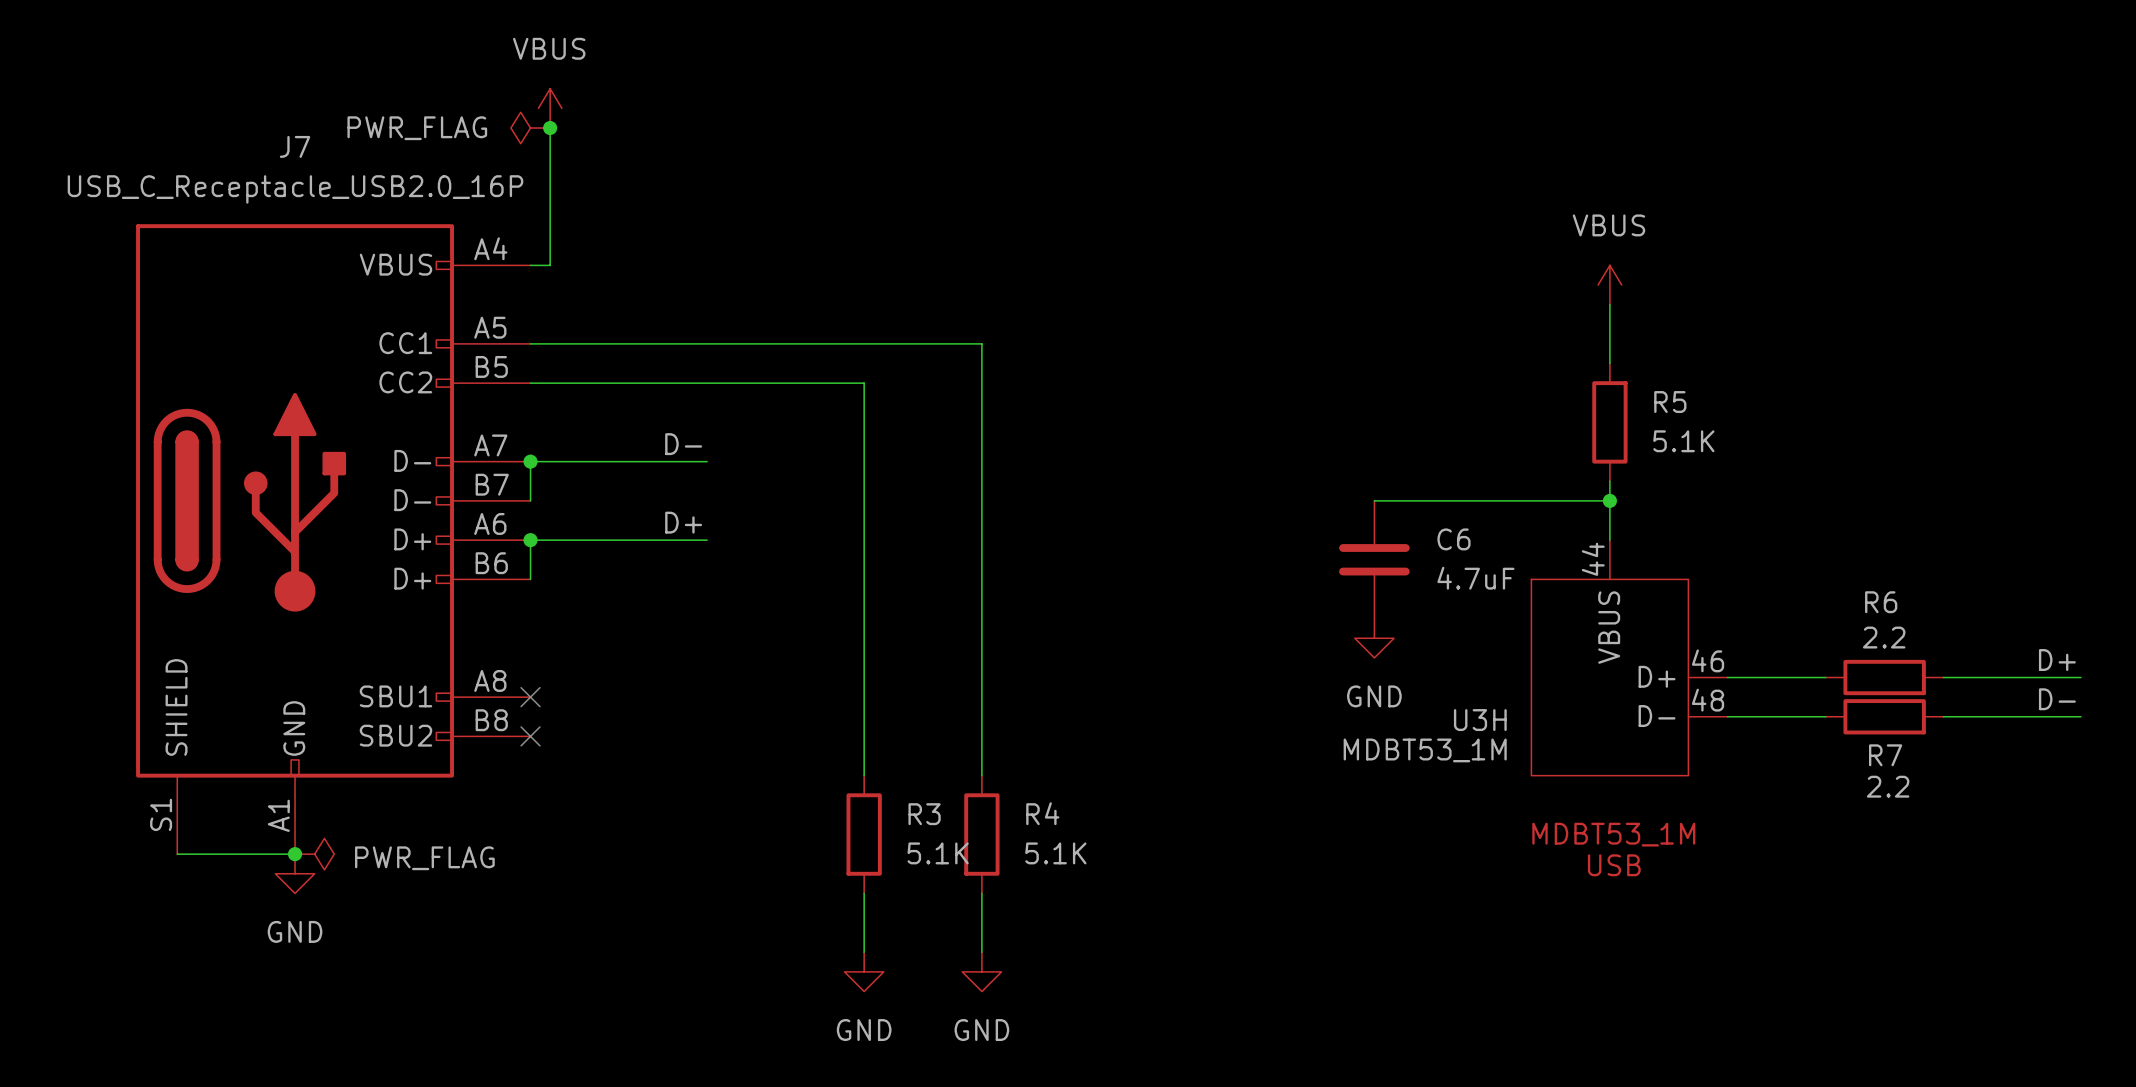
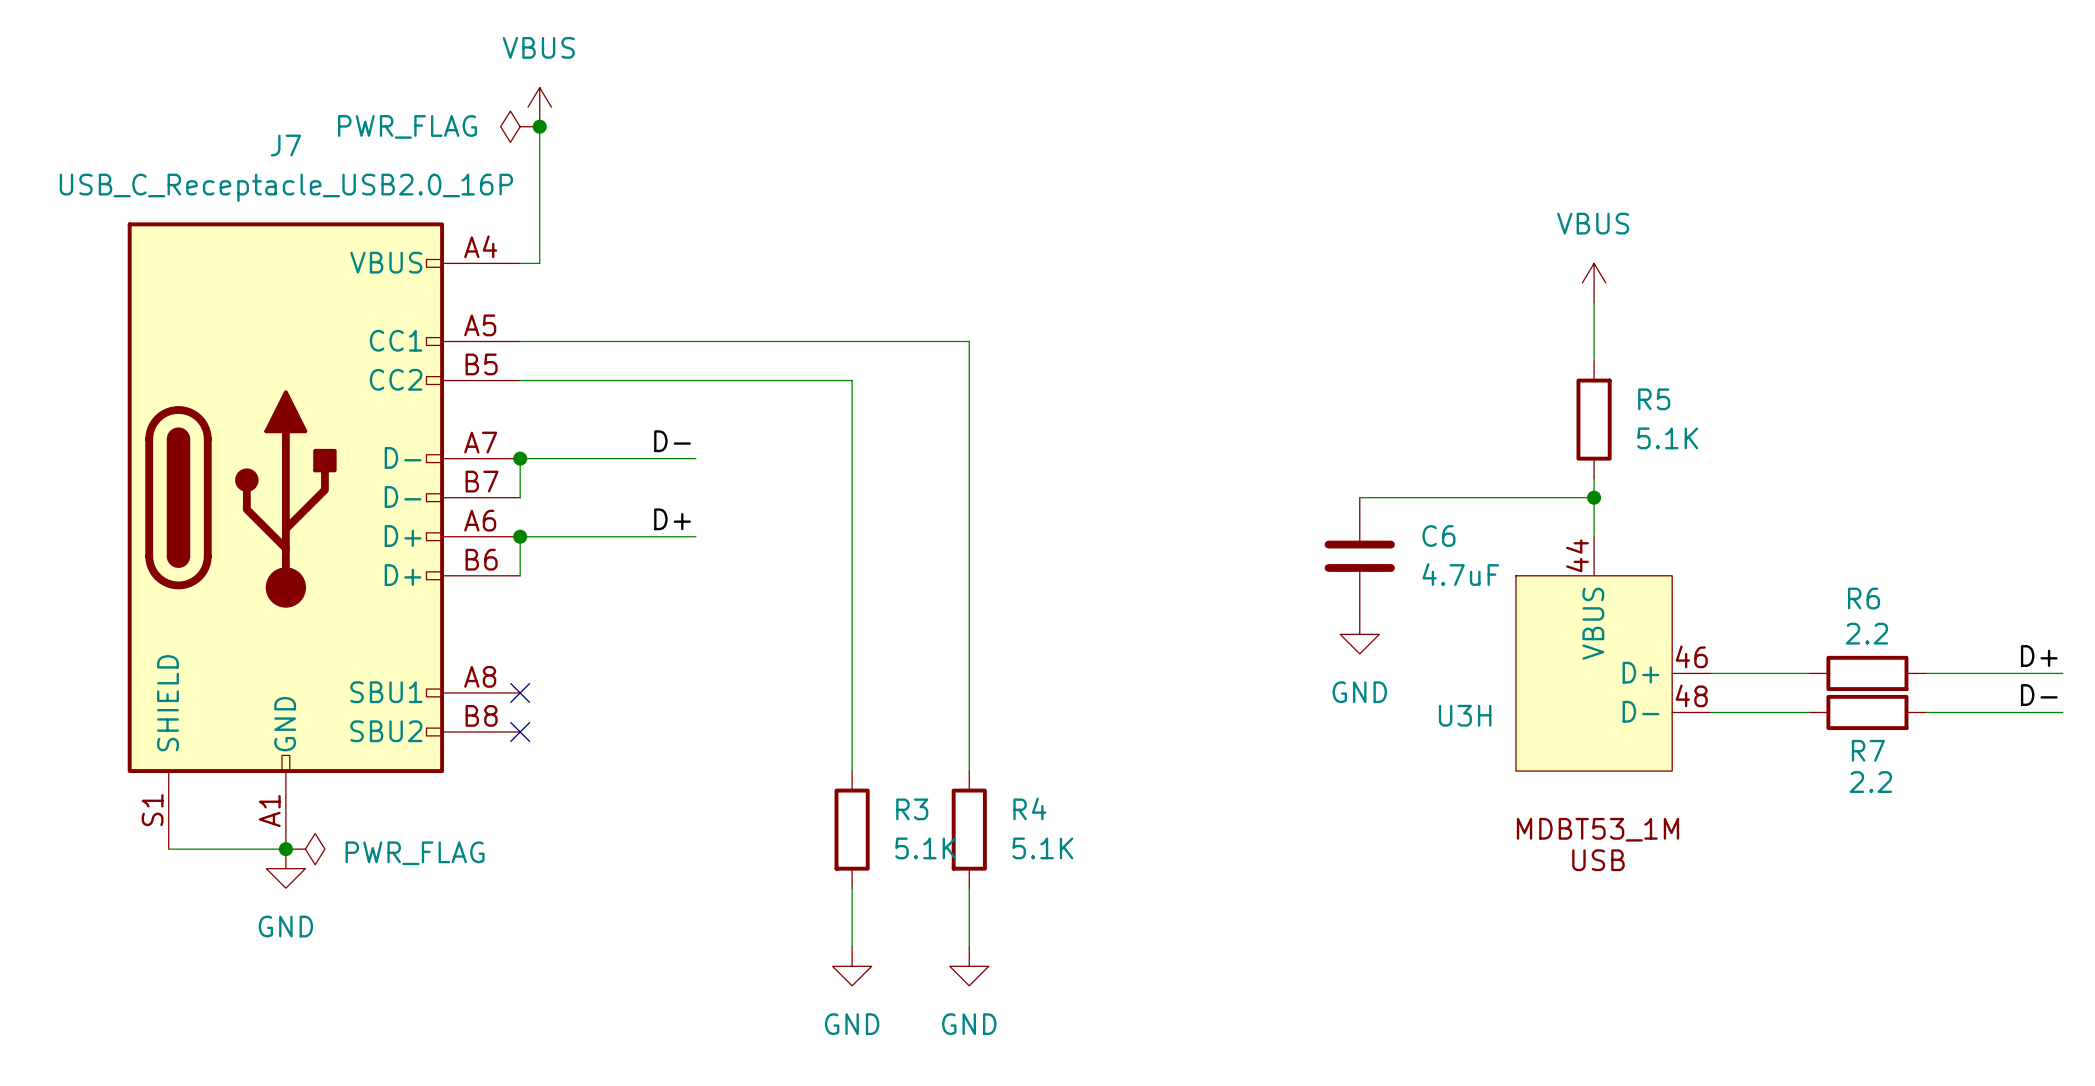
U3H value: MDBT53_1M (1425, 750) -> none

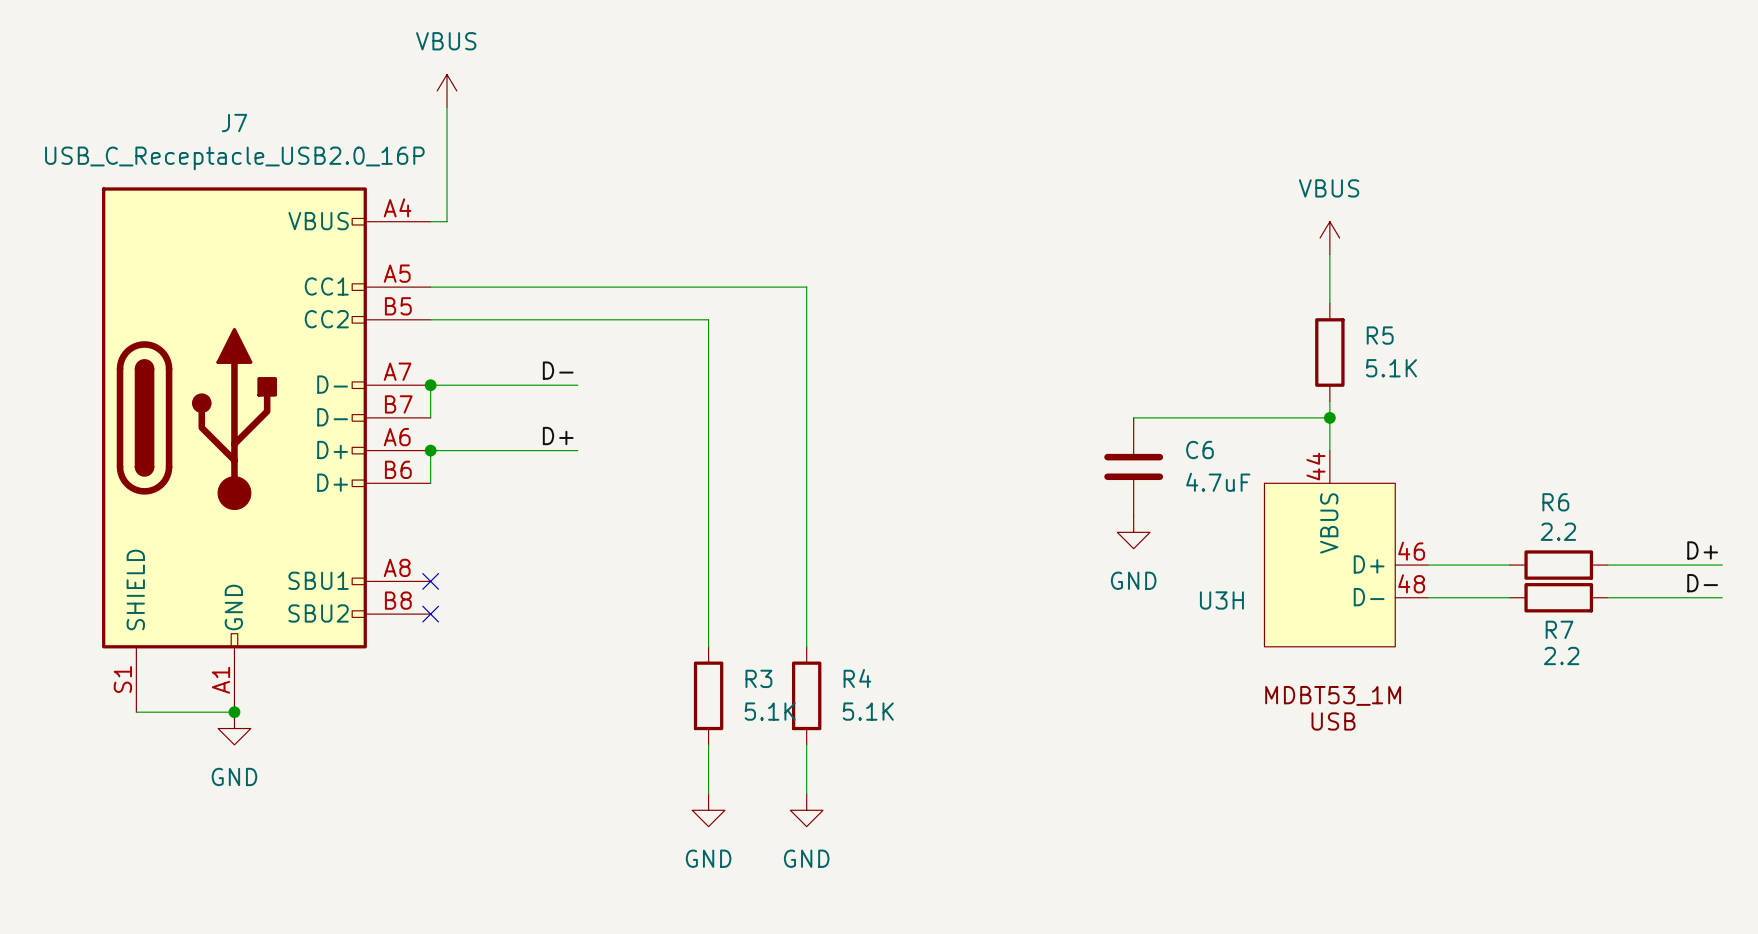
power symbol: PWR_FLAG (520, 126) -> none
junction: (539, 126) -> none
power symbol: PWR_FLAG (305, 849) -> none

